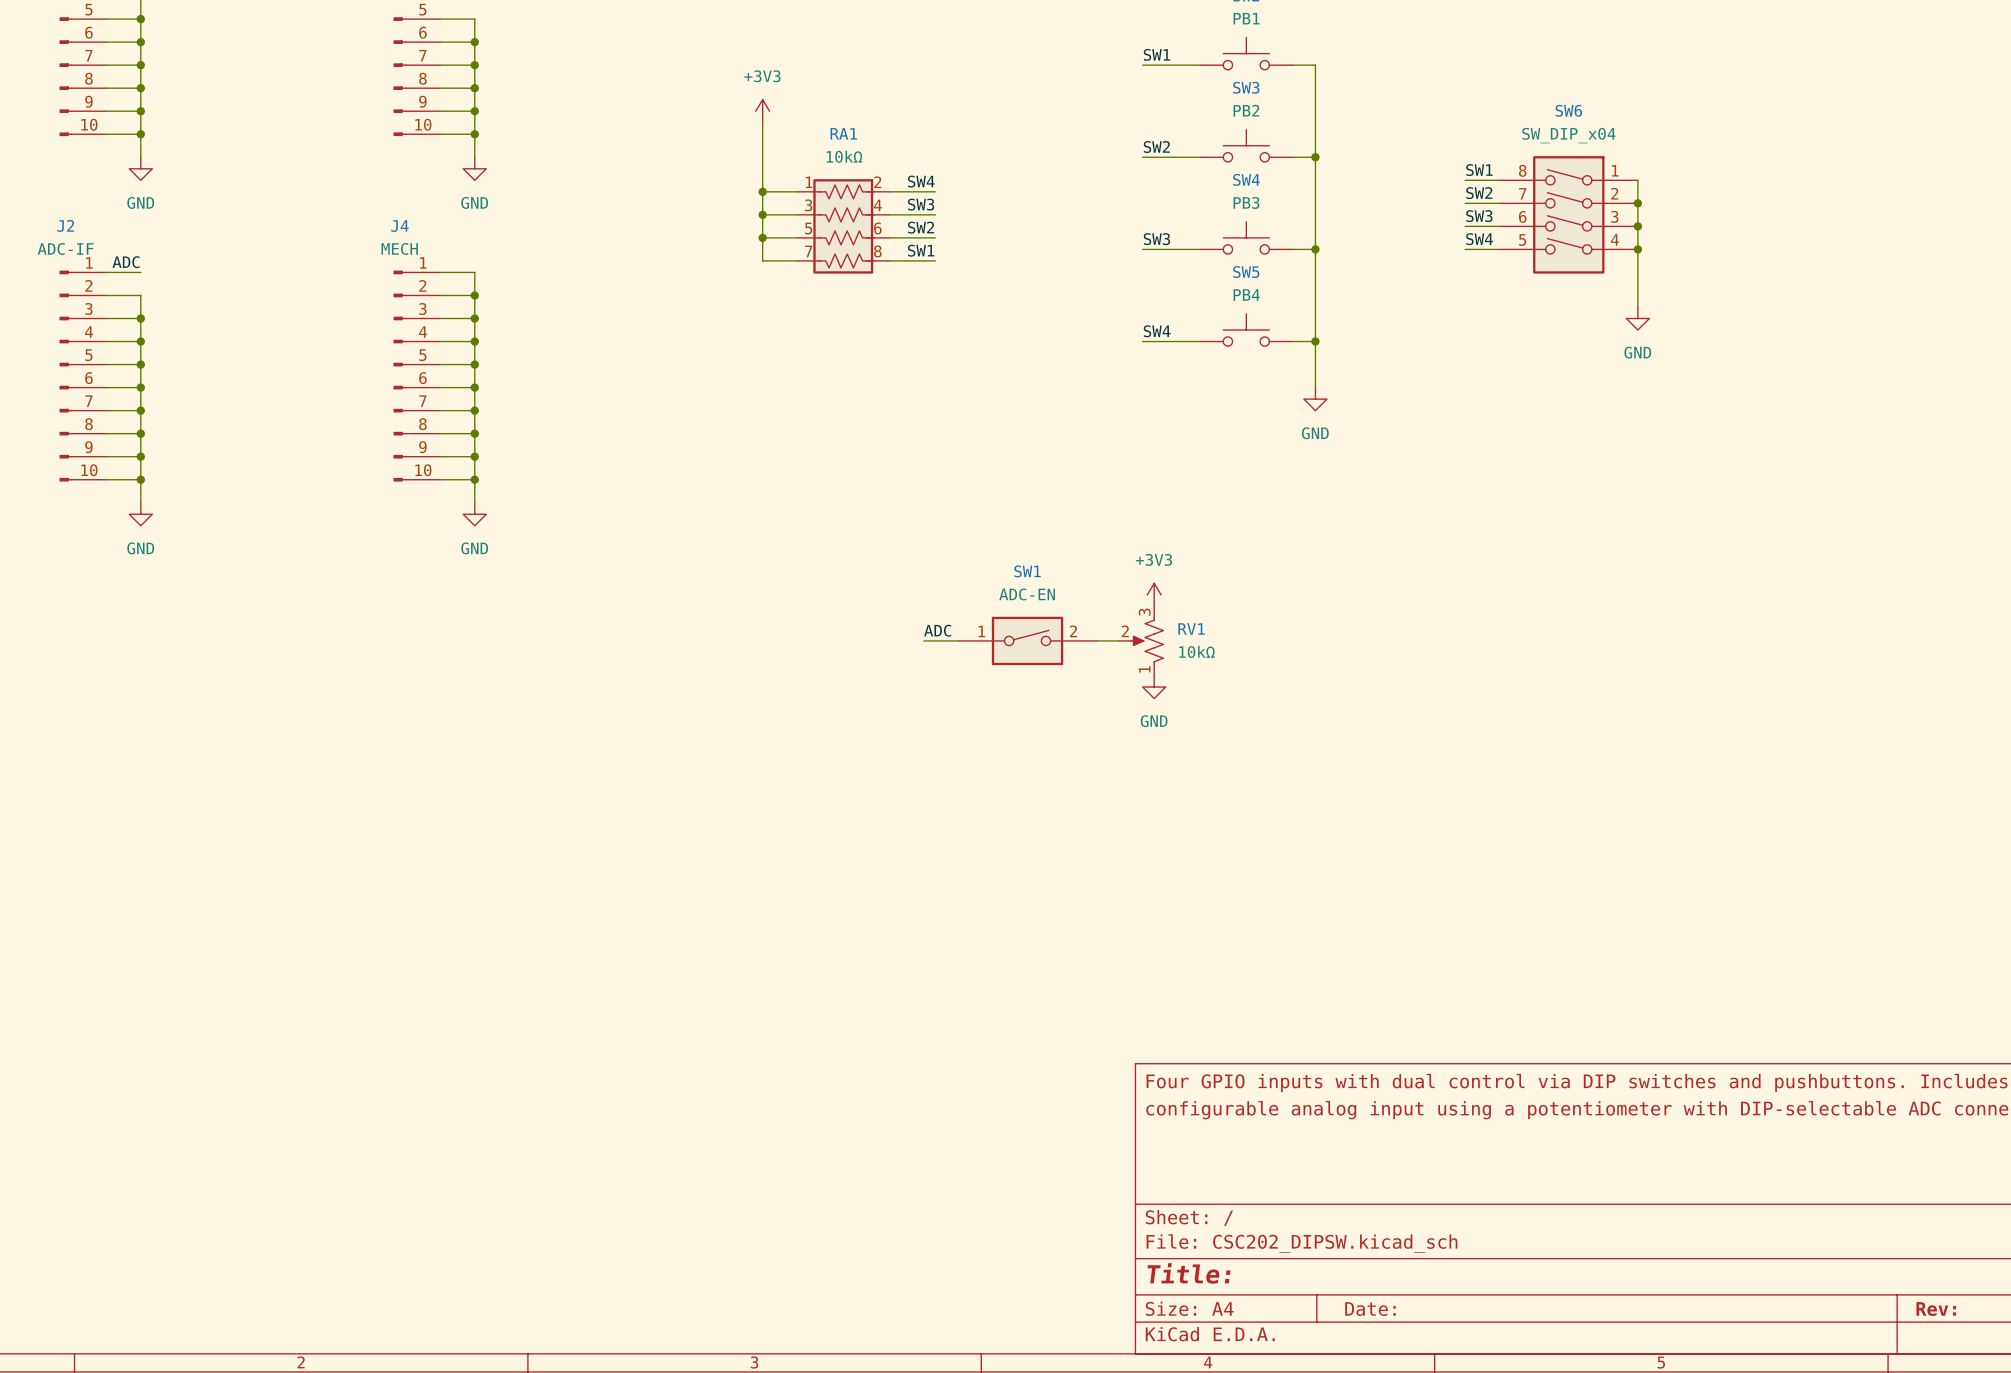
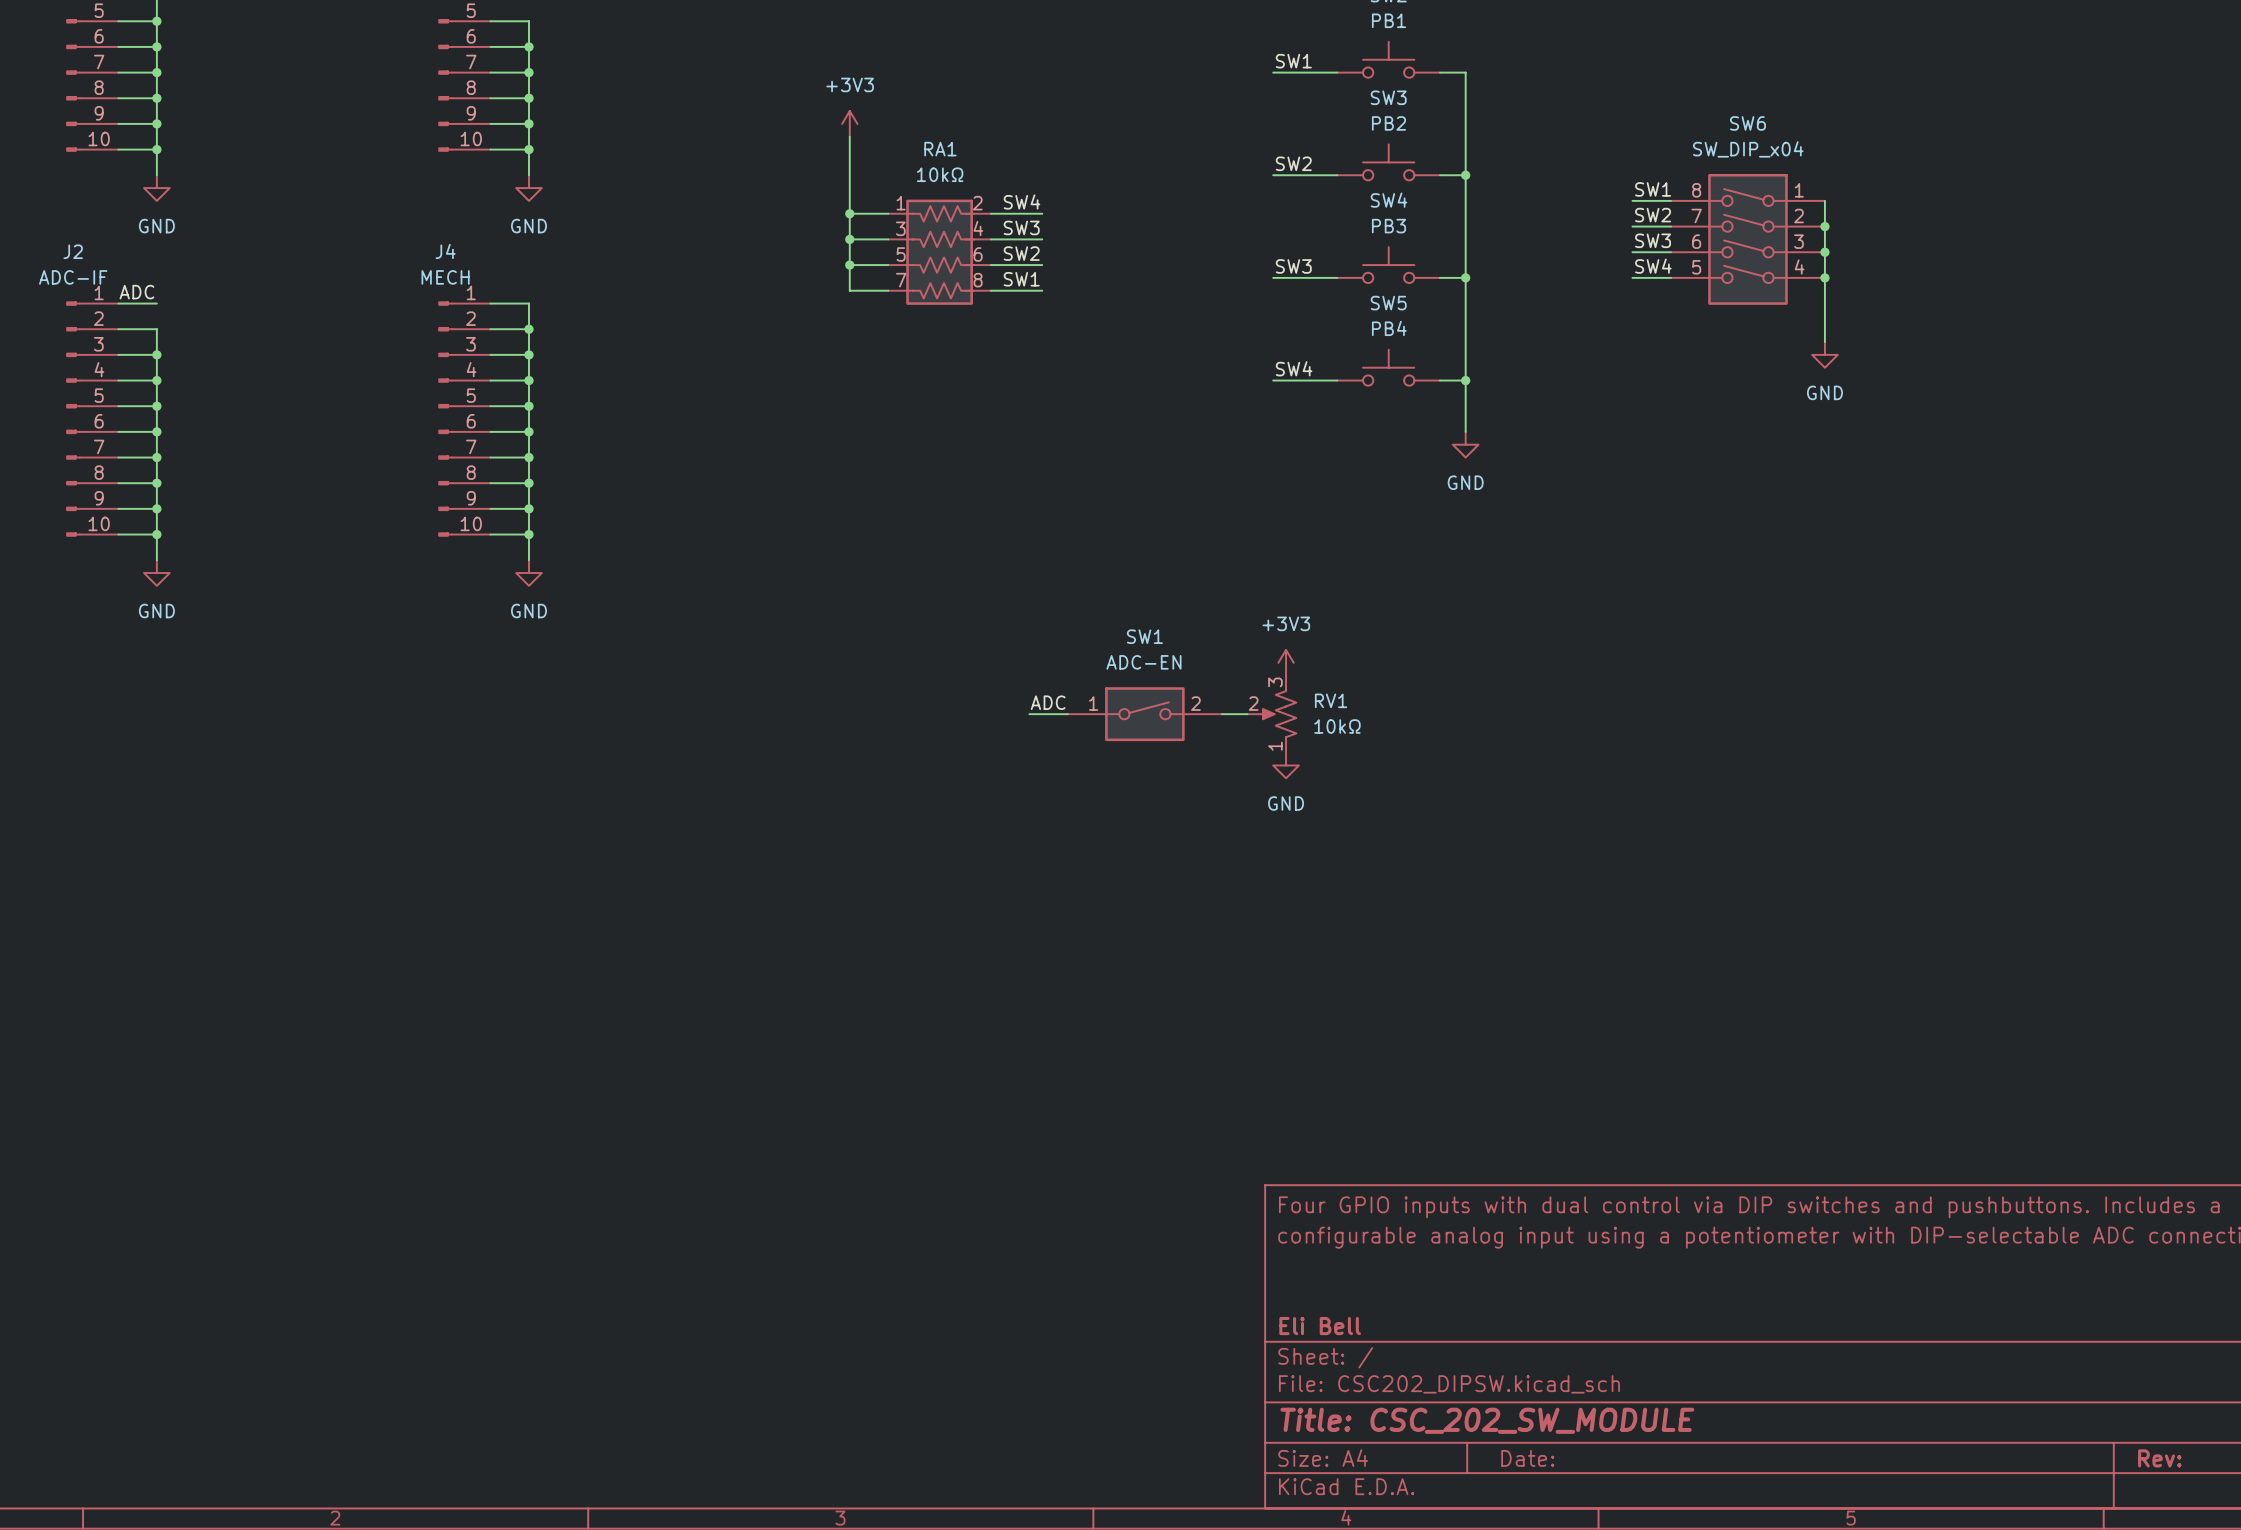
title block: none -> Eli Bell (1320, 1326)
title block: Title: (1188, 1273) -> Title: CSC_202_SW_MODULE (1487, 1420)

